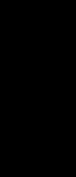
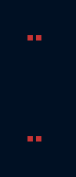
part: none -> (34, 37)
part: none -> (34, 138)

